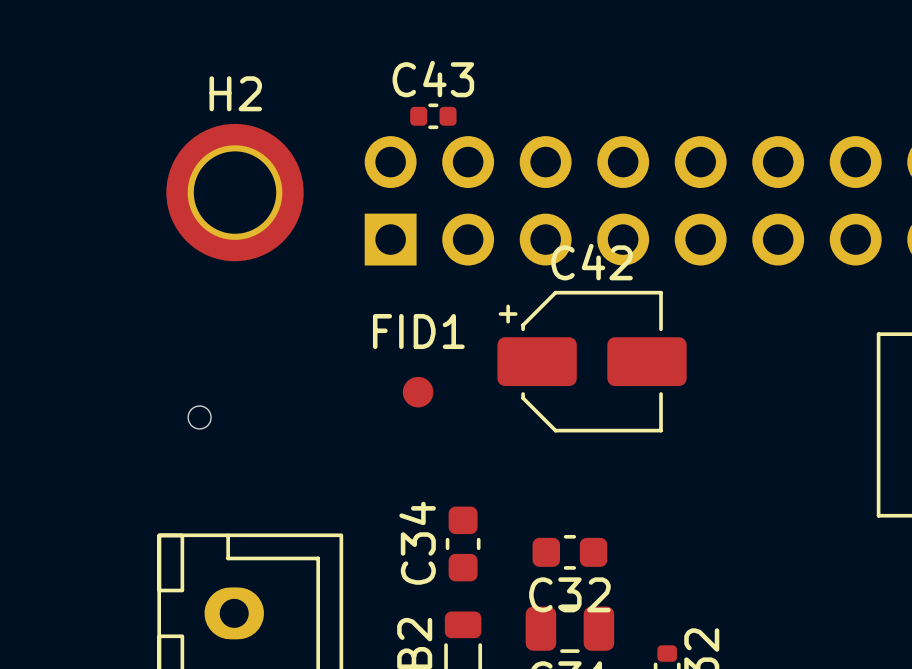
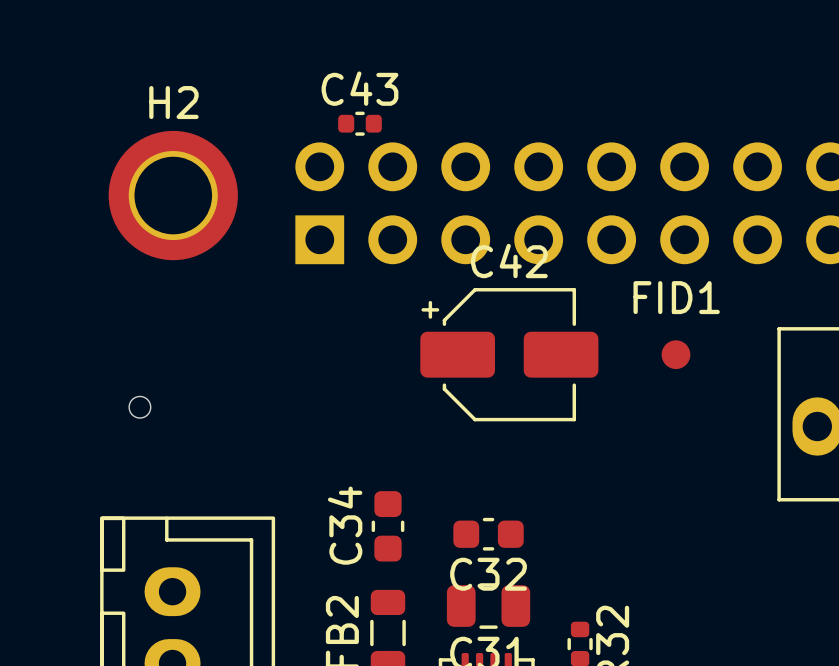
FID1 position: (418, 392) -> (675, 354)

